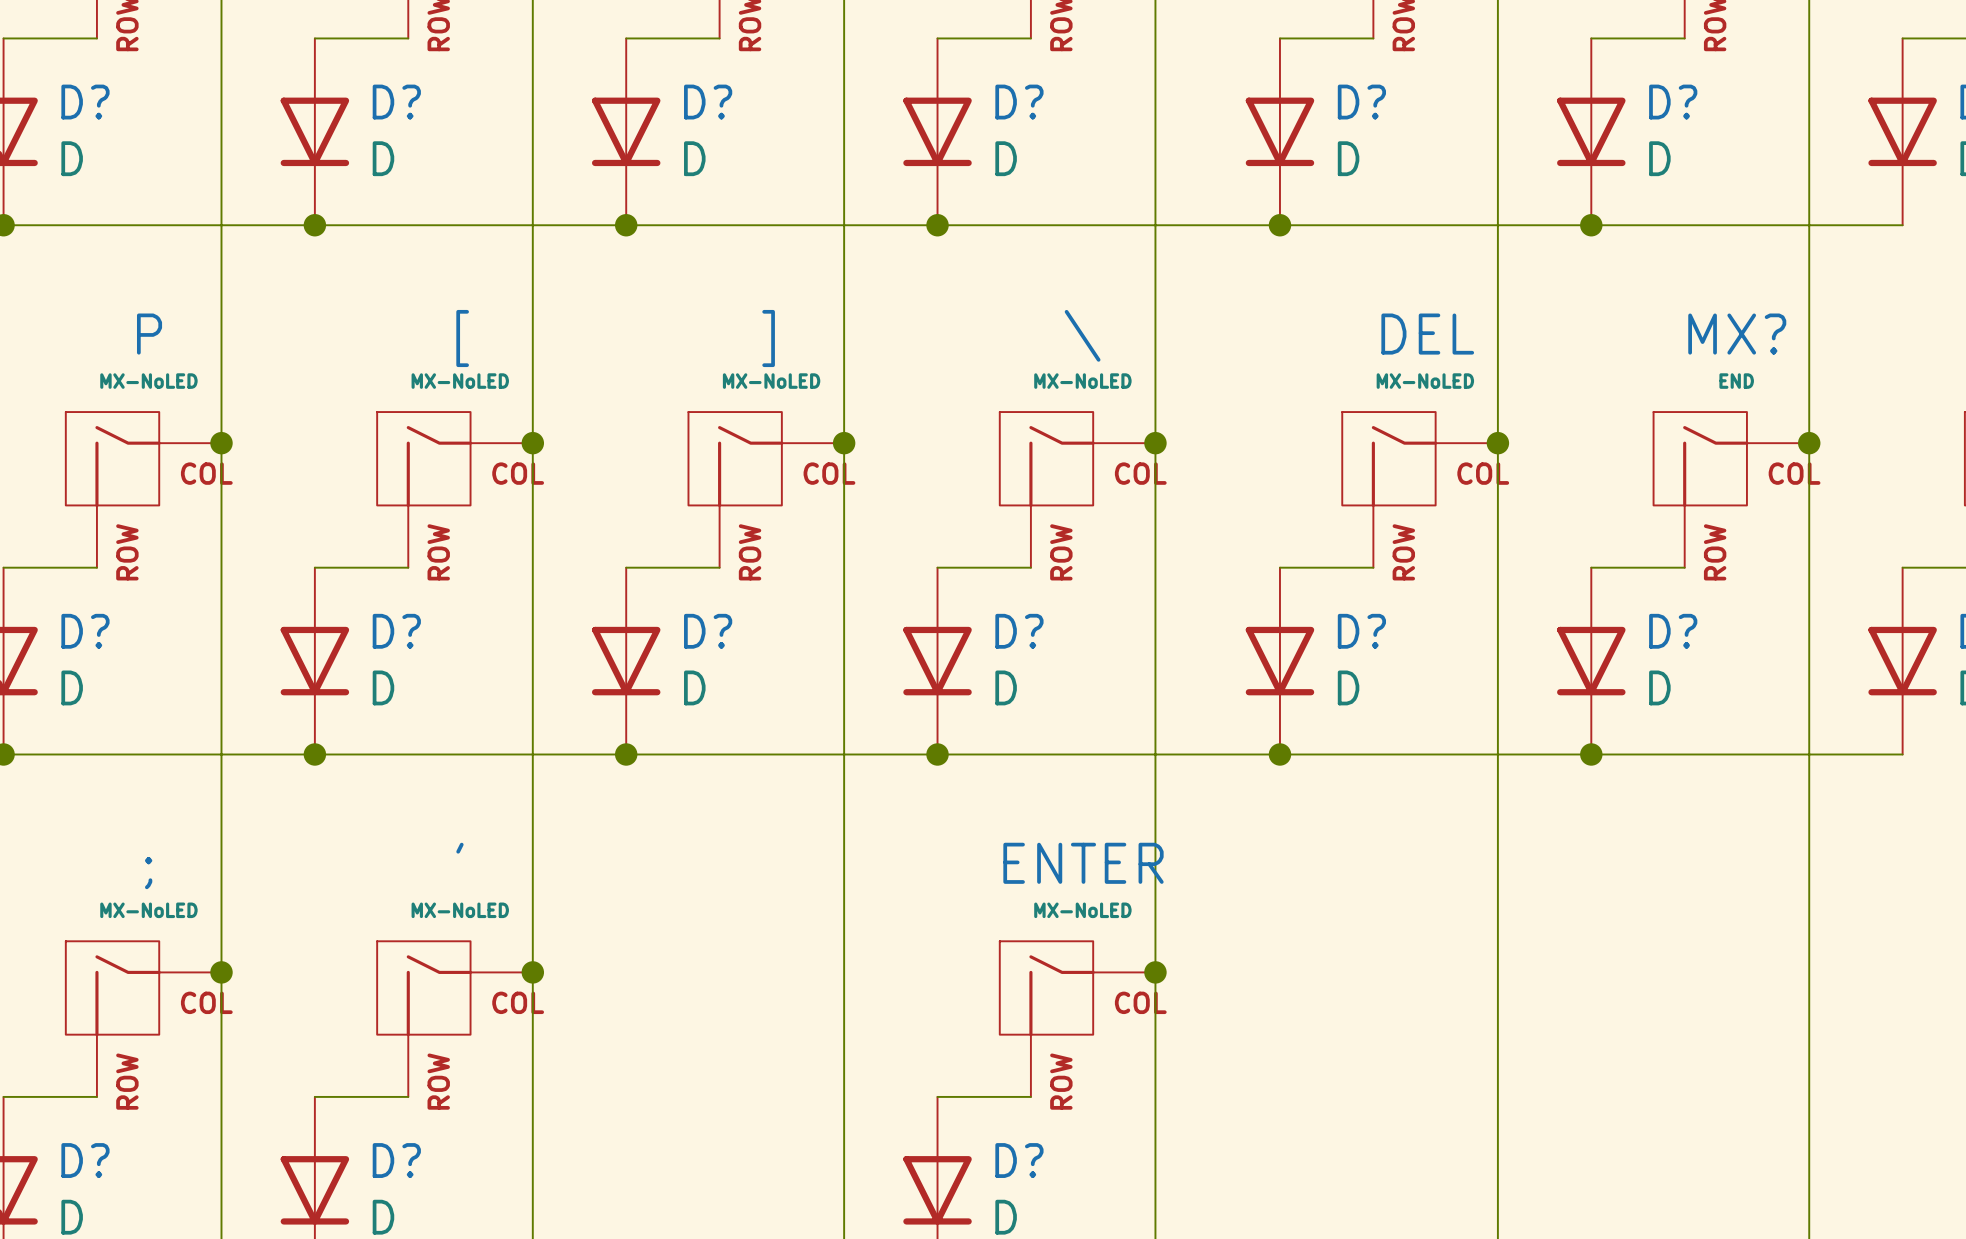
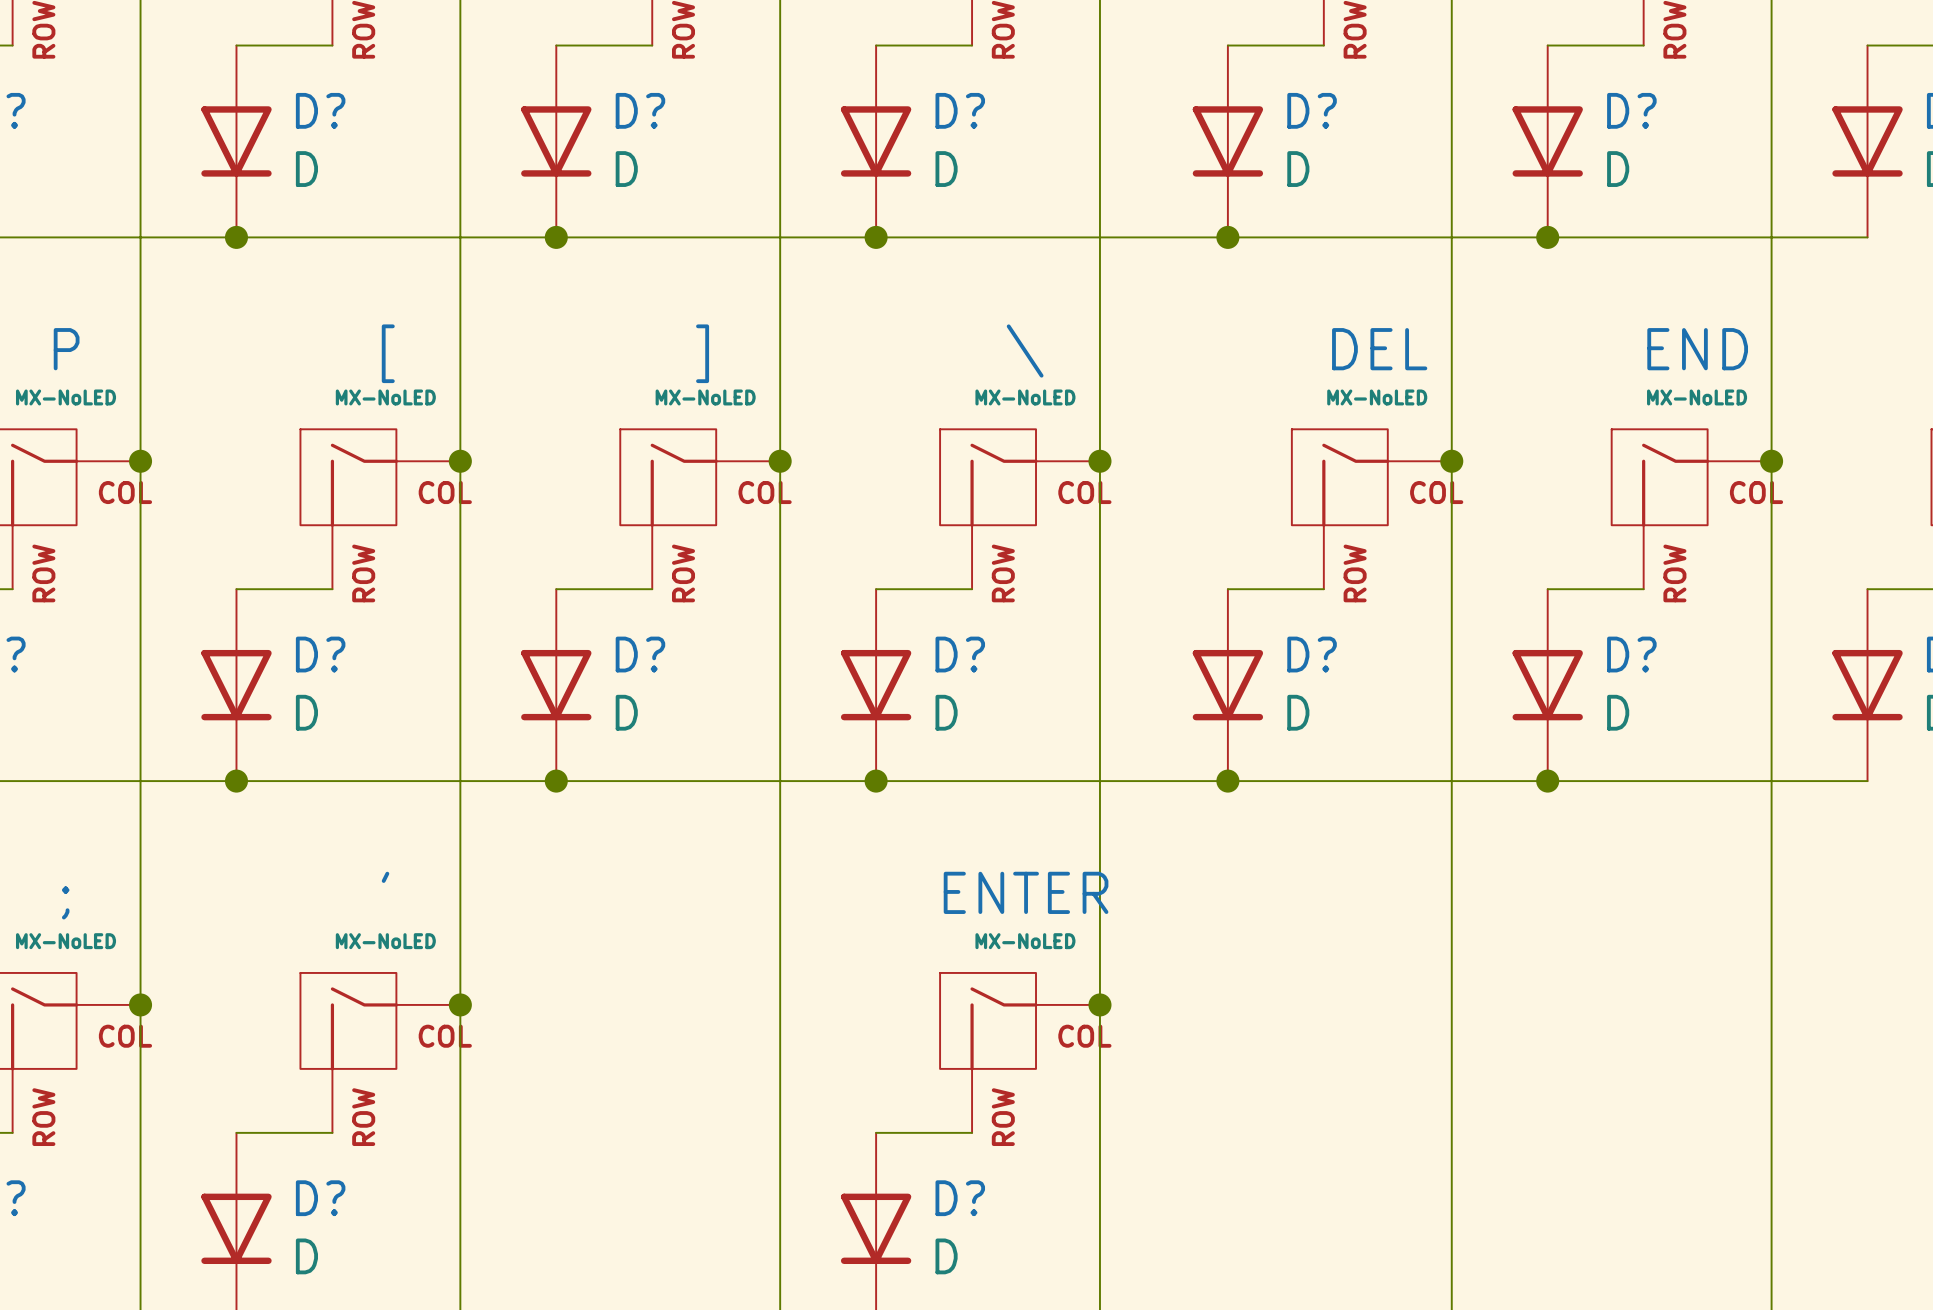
MX? name: MX? (1737, 334) -> END (1697, 349)
MX? value: END (1736, 381) -> MX-NoLED (1697, 397)

